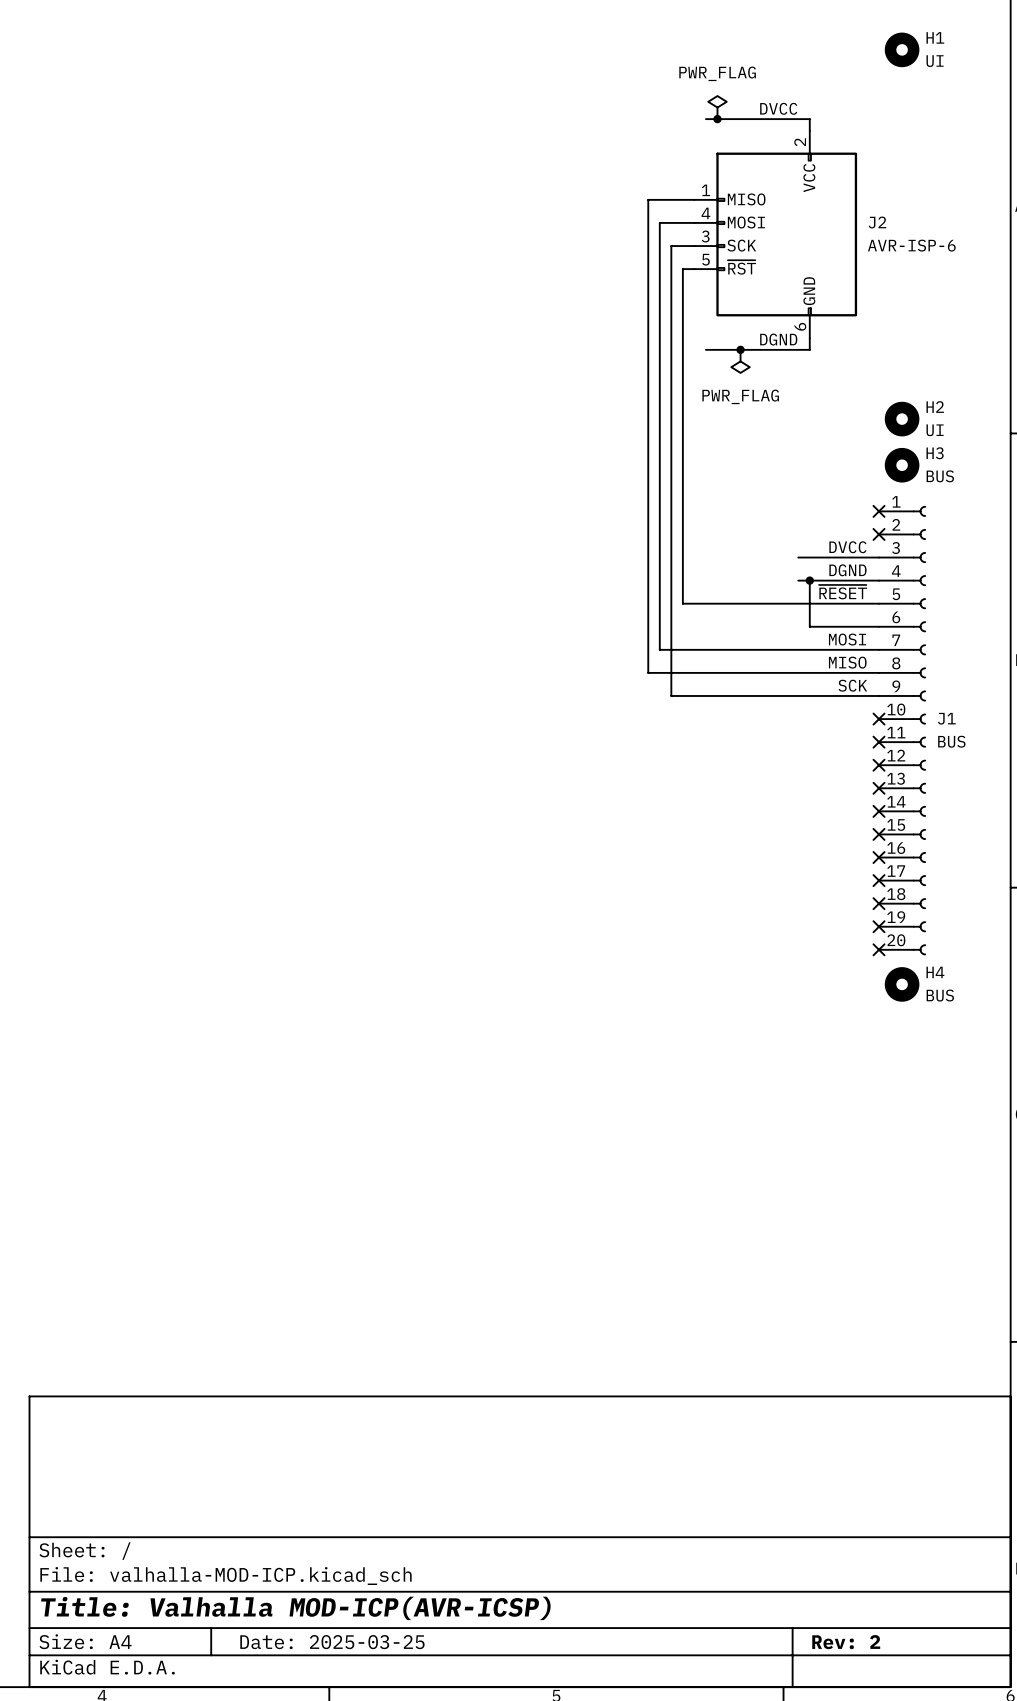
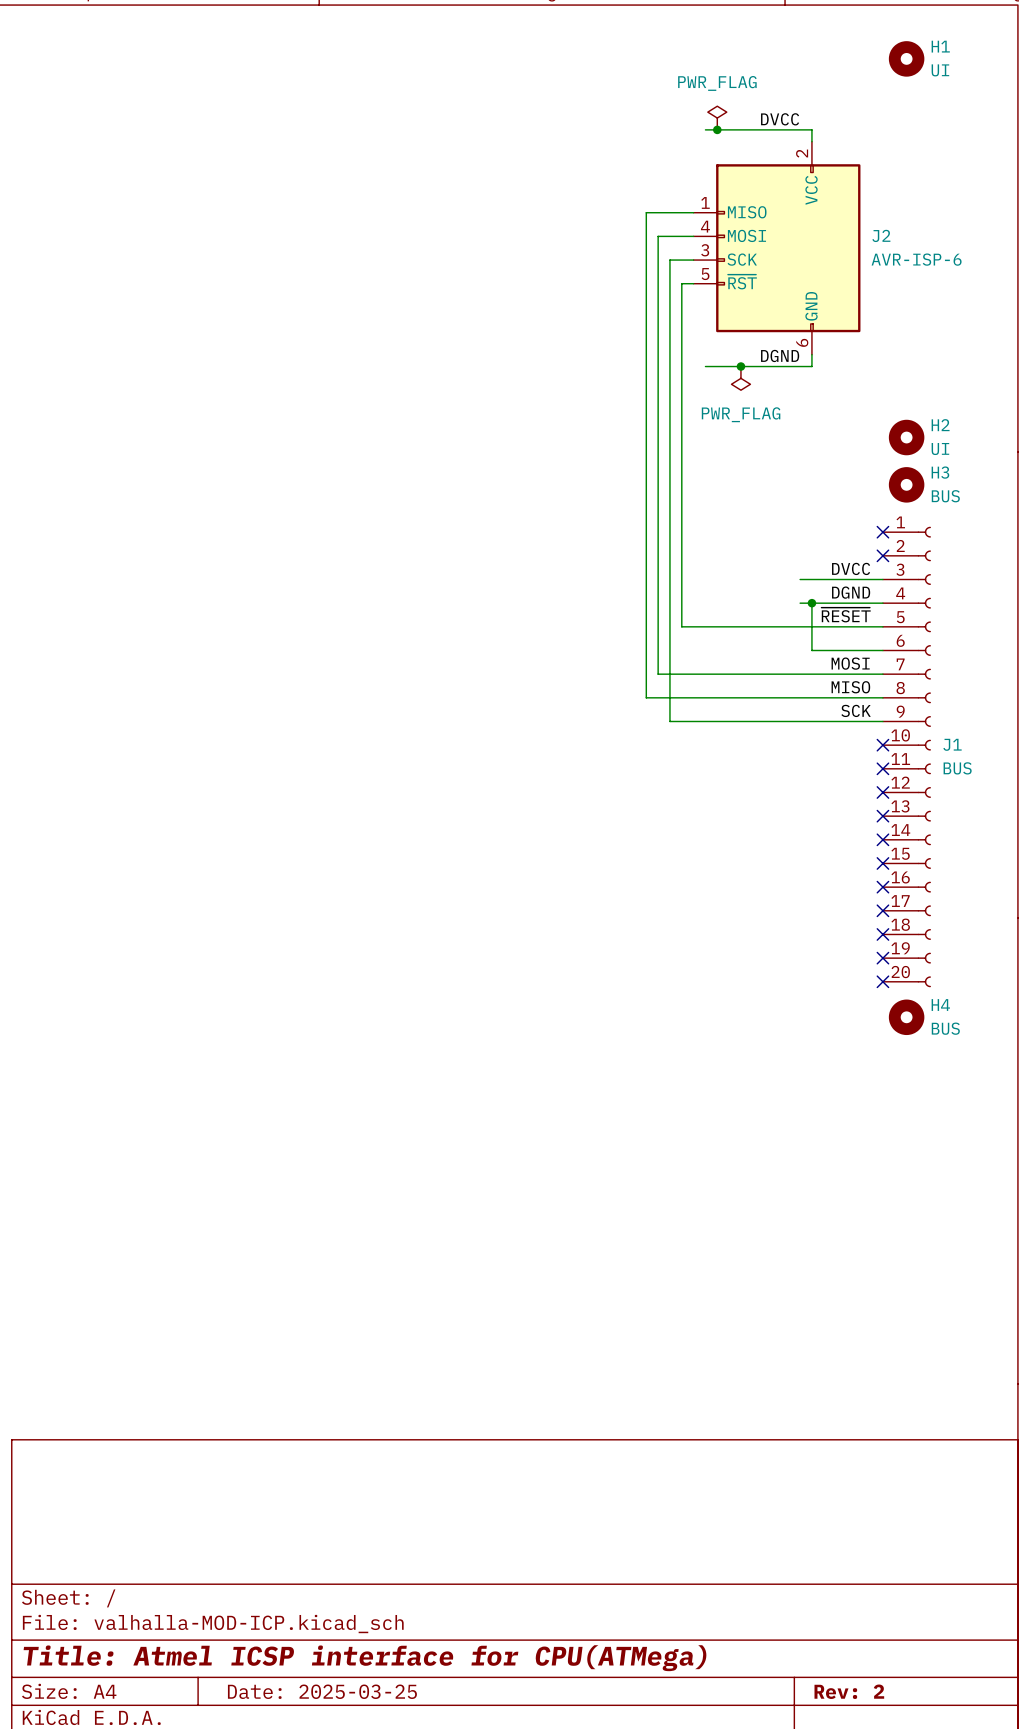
title block: Title: Valhalla MOD-ICP(AVR-ICSP) (295, 1608) -> Title: Atmel ICSP interface for CPU(ATMega) (365, 1658)

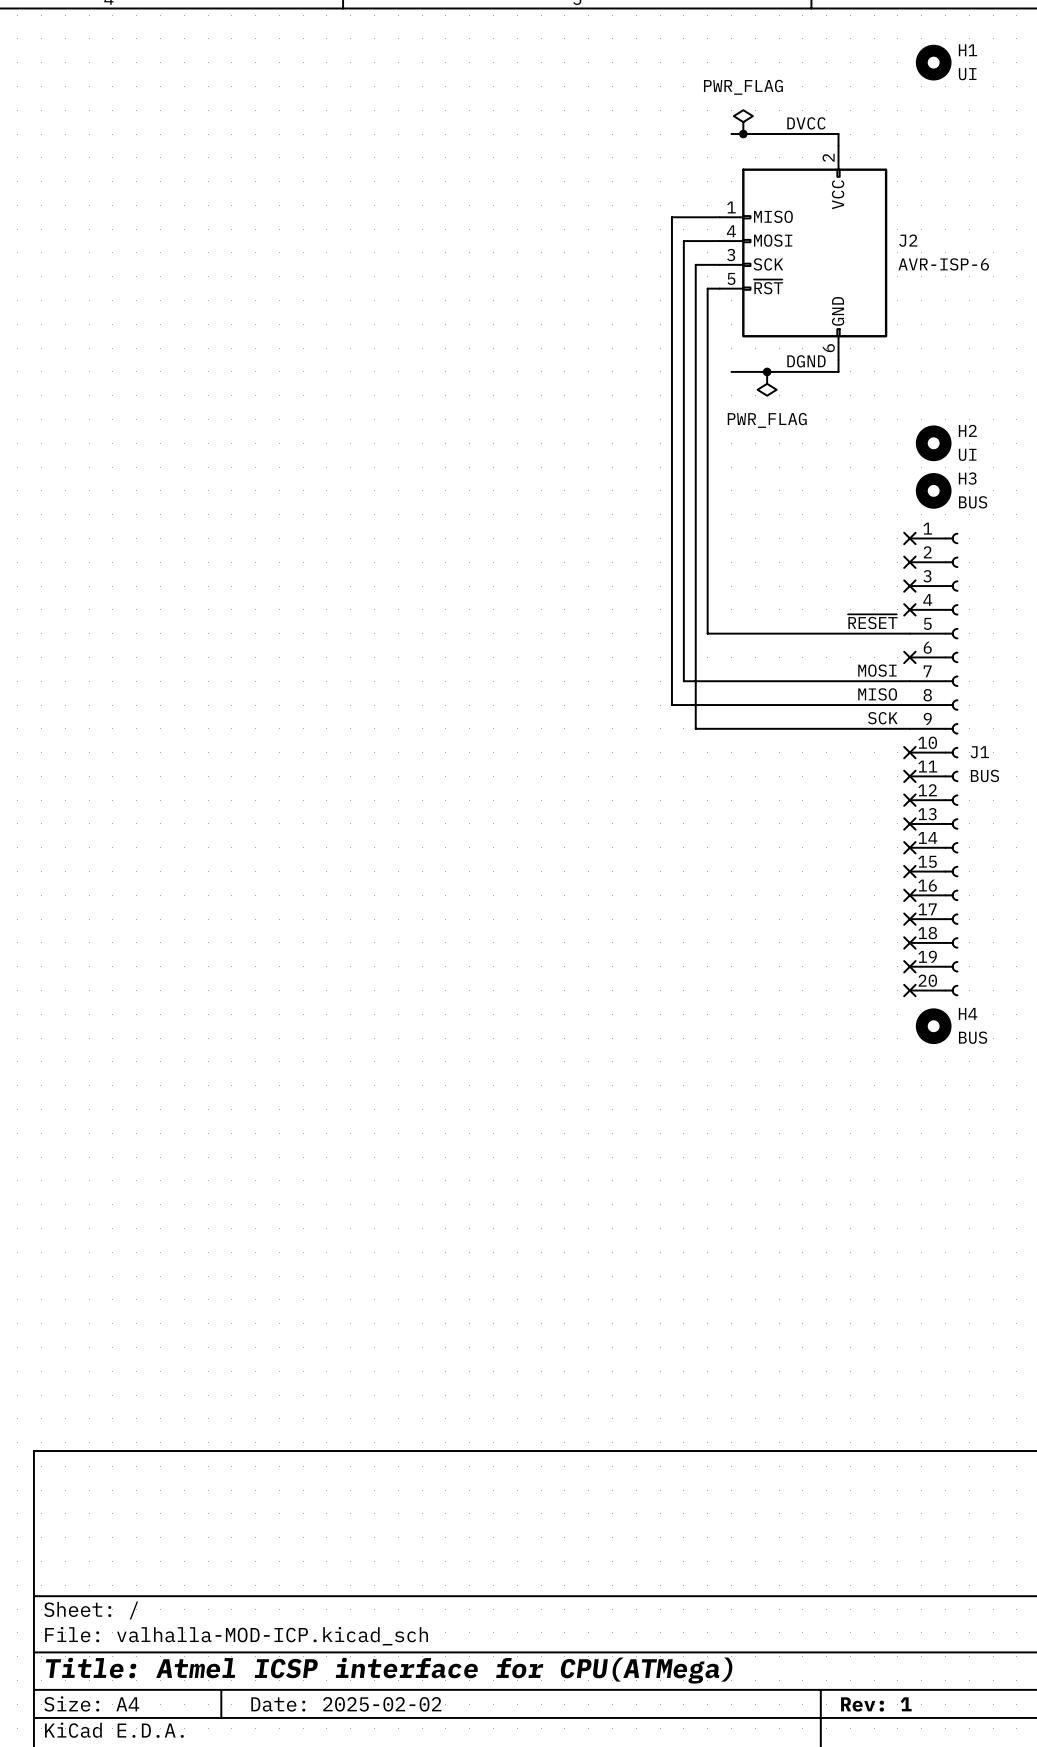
label: DVCC (851, 568) -> none
wire: (800, 579) (882, 579) -> none
no-connect mark: none -> (909, 586)
label: DGND (851, 592) -> none
wire: (800, 603) (882, 603) -> none
wire: (811, 603) (811, 650) (882, 650) -> none
junction: (811, 603) -> none
no-connect mark: none -> (909, 609)
no-connect mark: none -> (909, 657)
title block: Date: 2025-03-25 (322, 1691) -> Date: 2025-02-02 (346, 1704)
title block: Rev: 2 (849, 1691) -> Rev: 1 (876, 1704)

